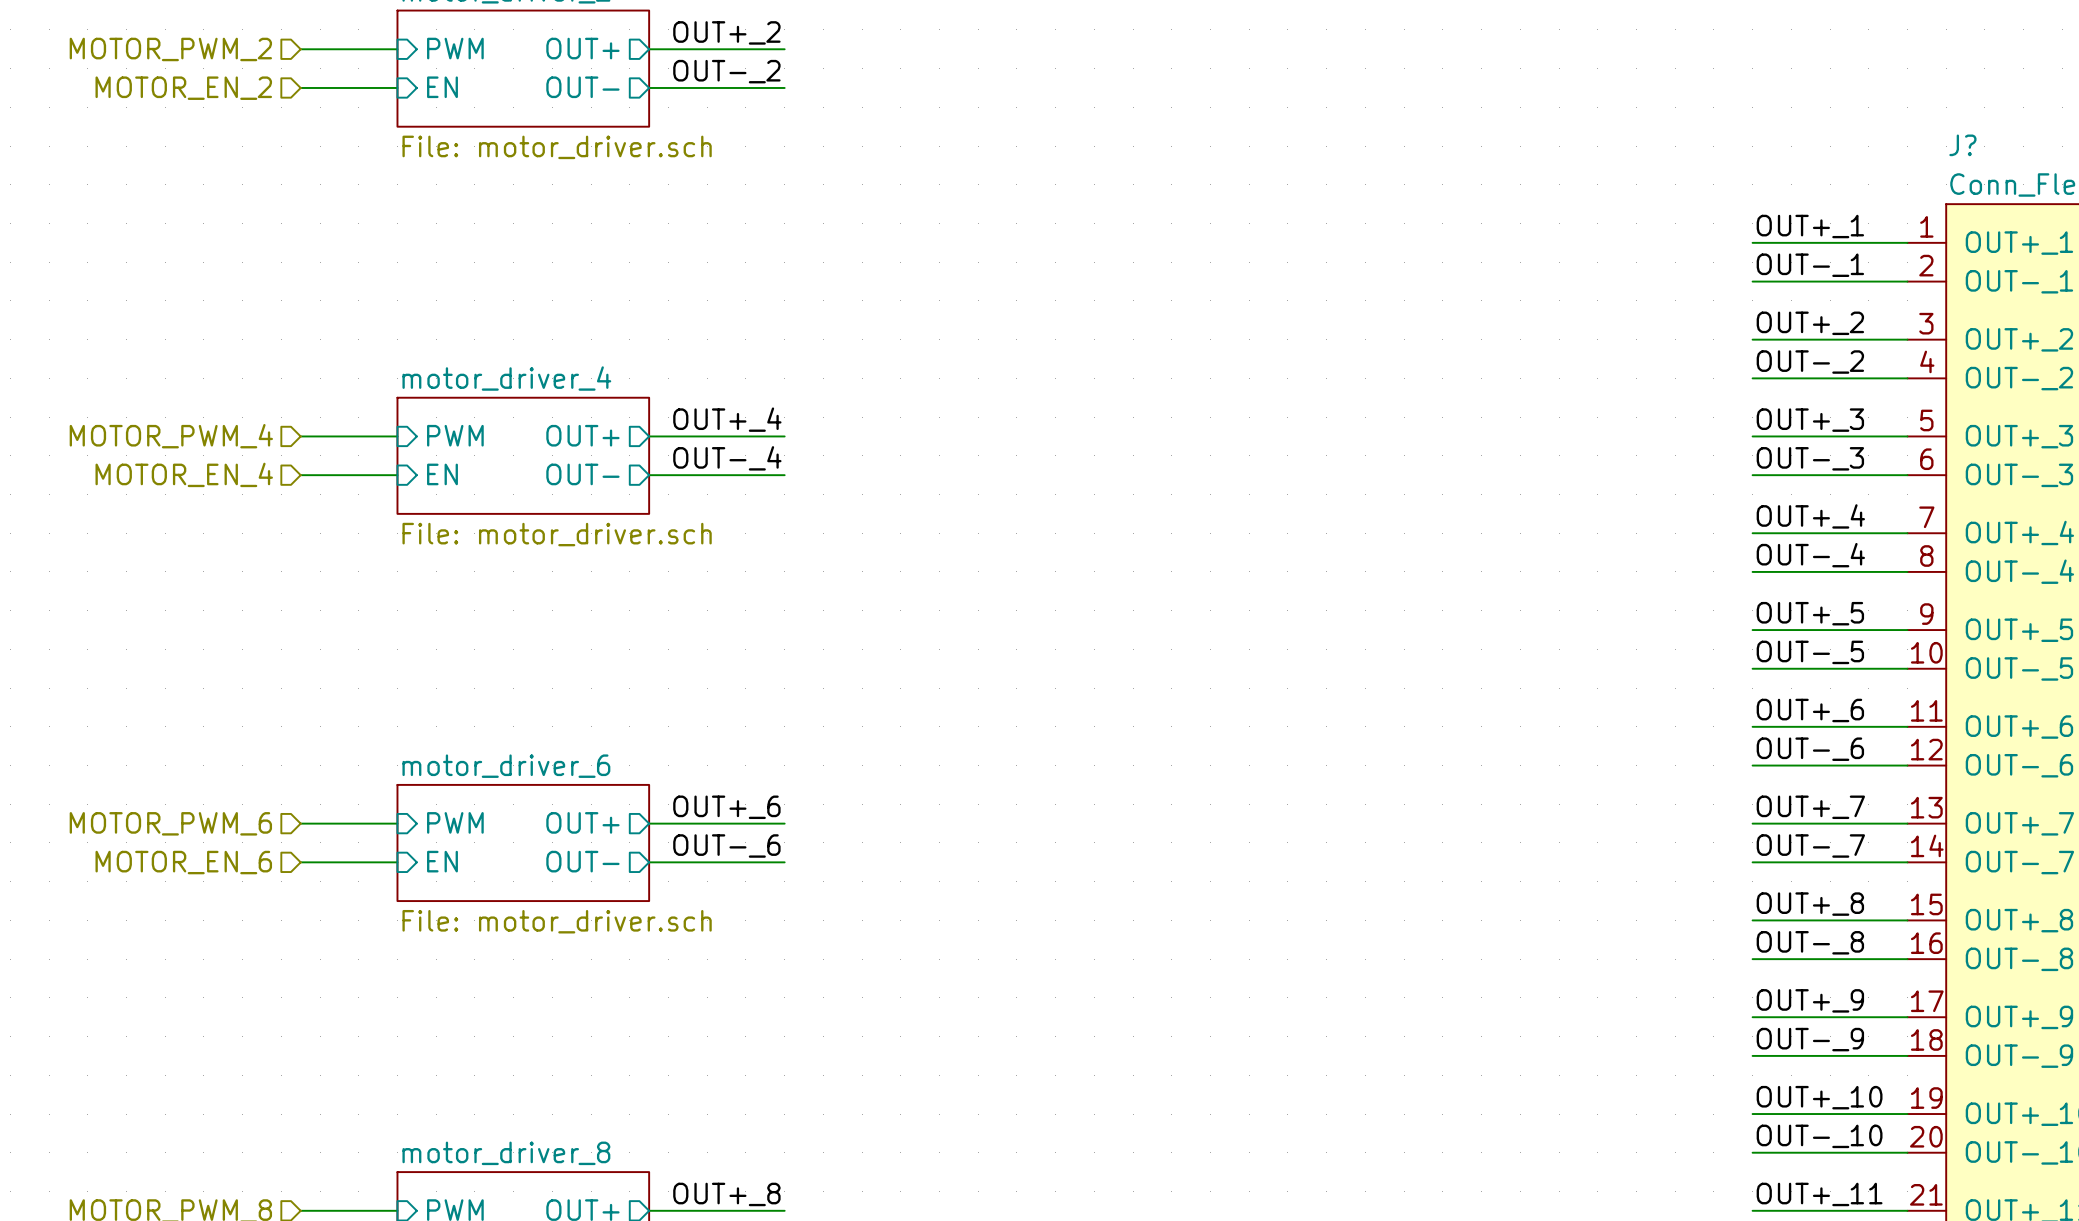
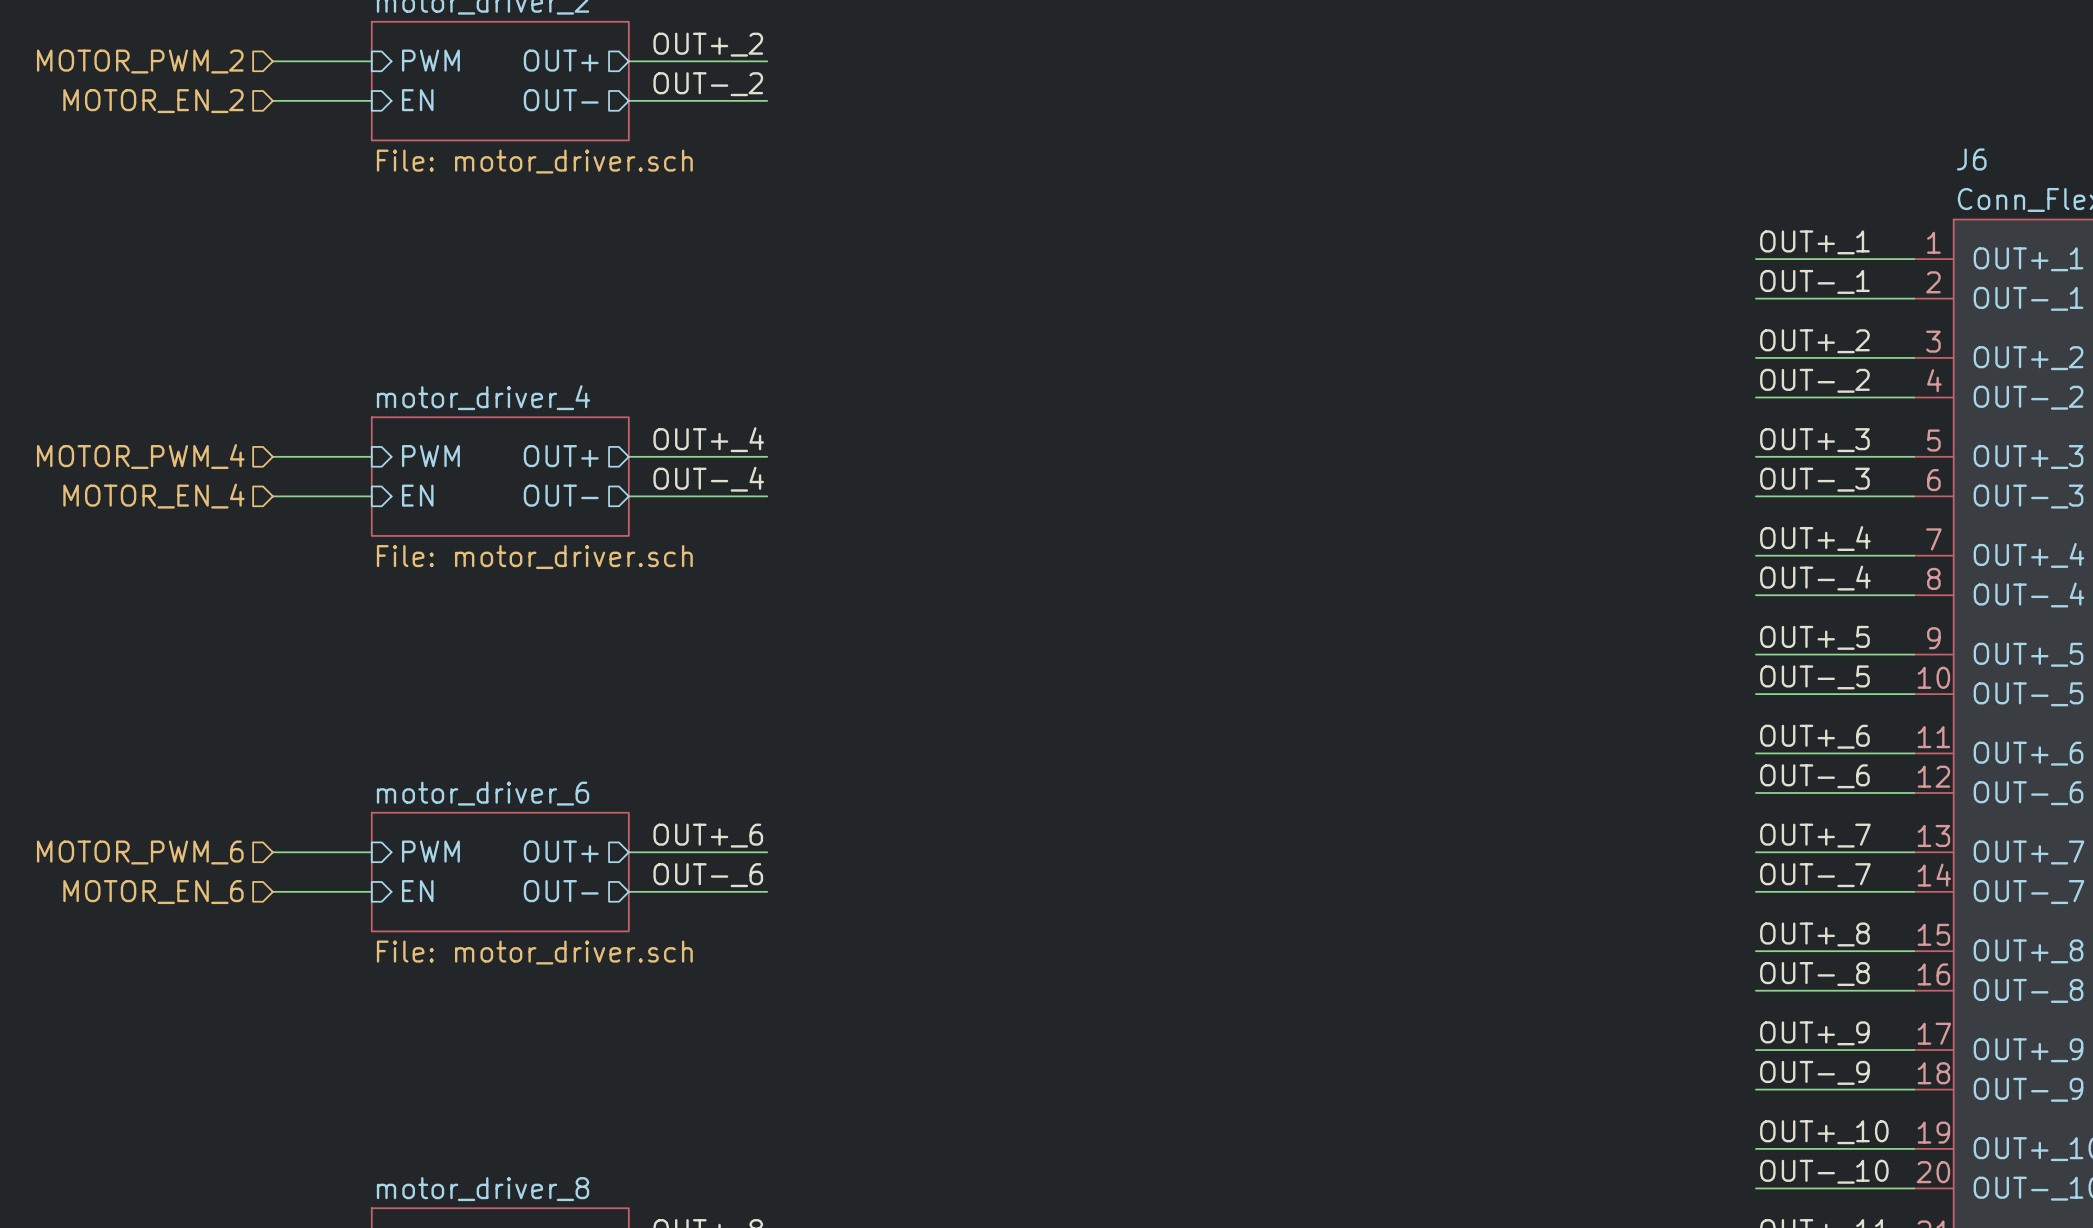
J? name: J? (1962, 145) -> J6 (1971, 159)

